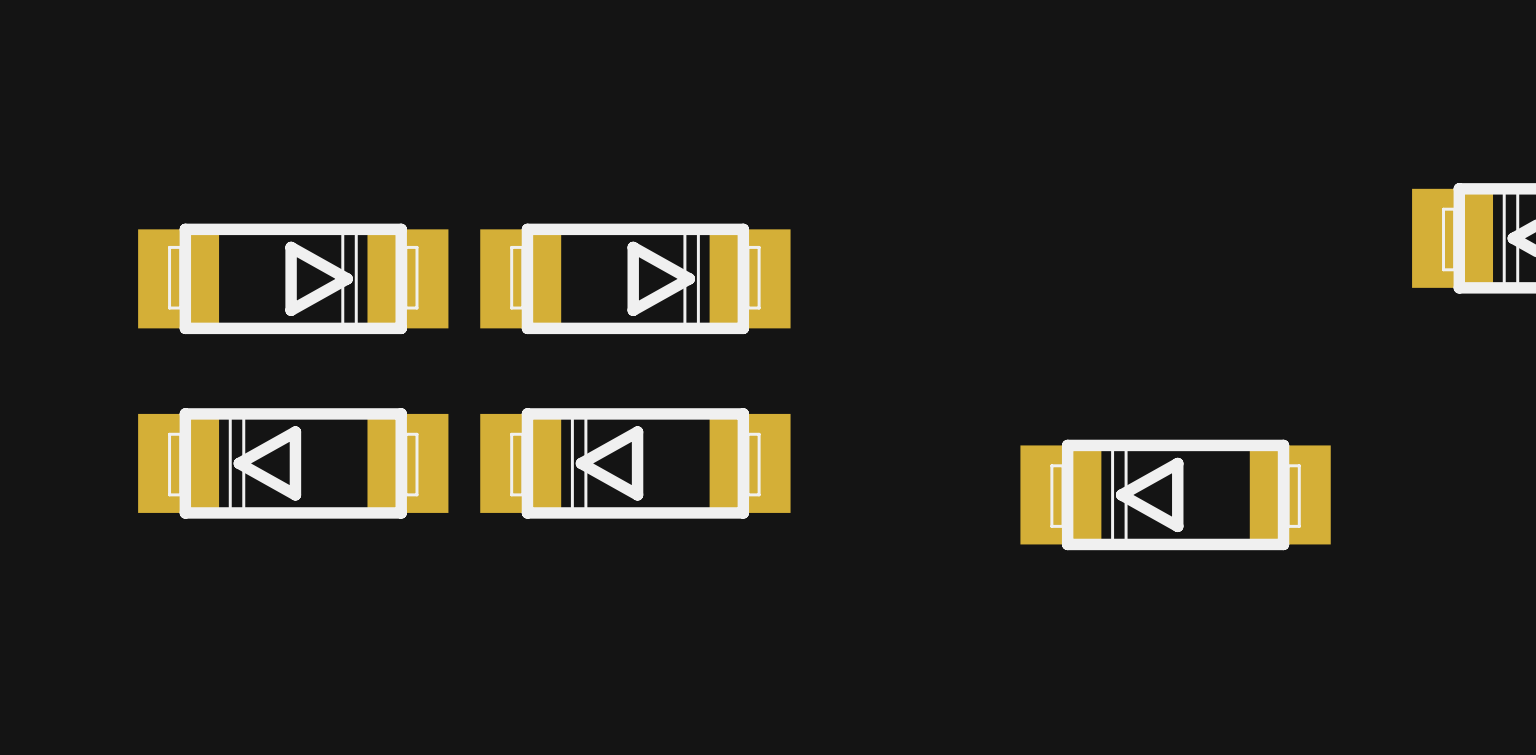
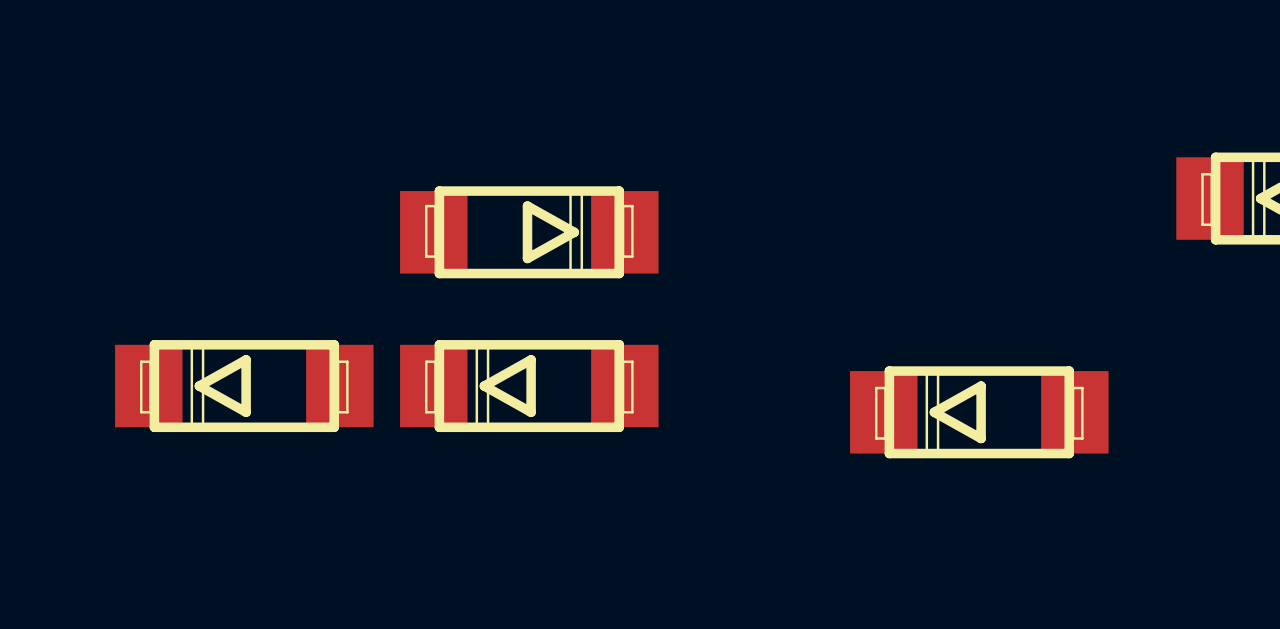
part: (293, 278) -> none

